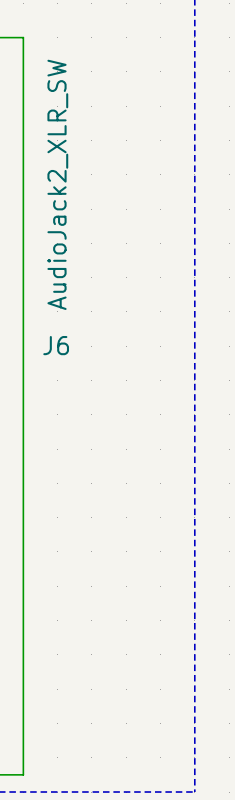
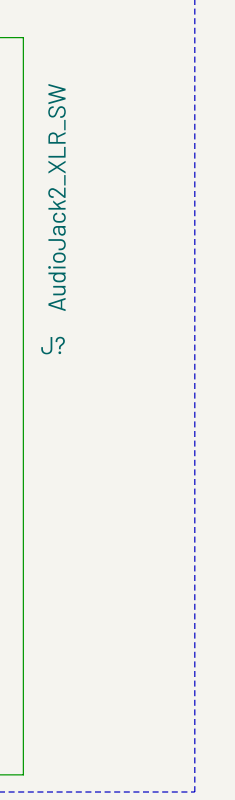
J6 name: J6 (56, 345) -> J? (53, 345)

